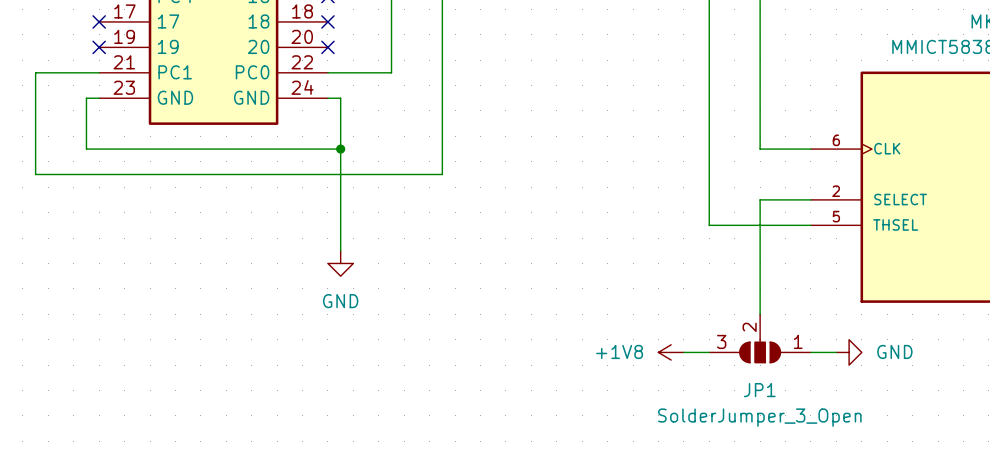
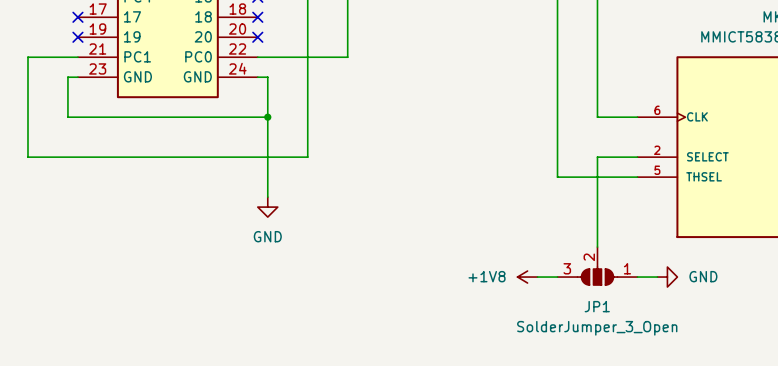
wire: (442, 72) (442, 174) (35, 174) -> (347, 57) (307, 57) (307, 157) (27, 157) (27, 137)

